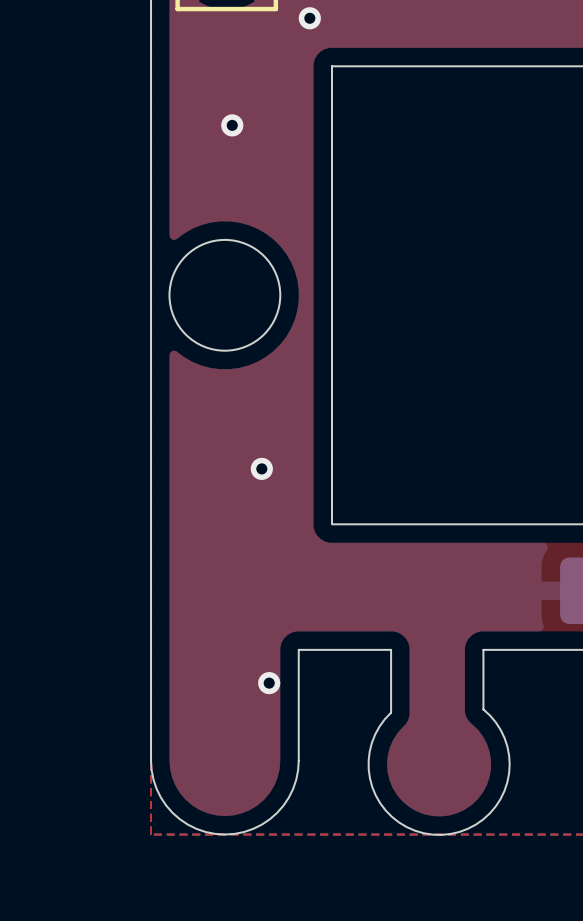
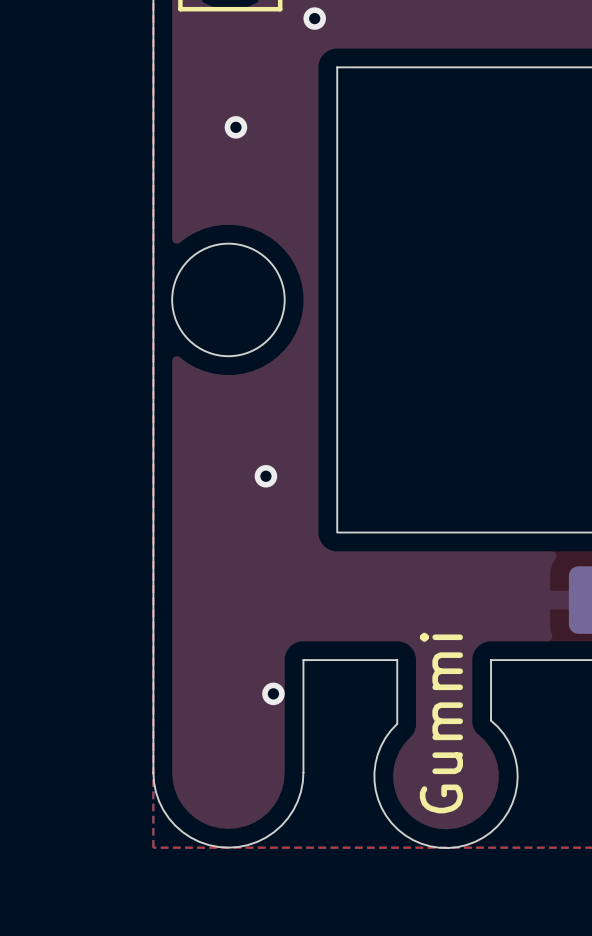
text: none -> Gummi (441, 723)

